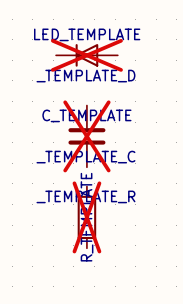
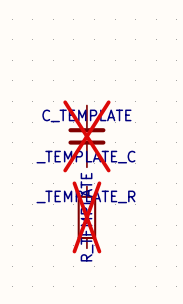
_TEMPLATE_D: LED_TEMPLATE (86, 55) -> none

